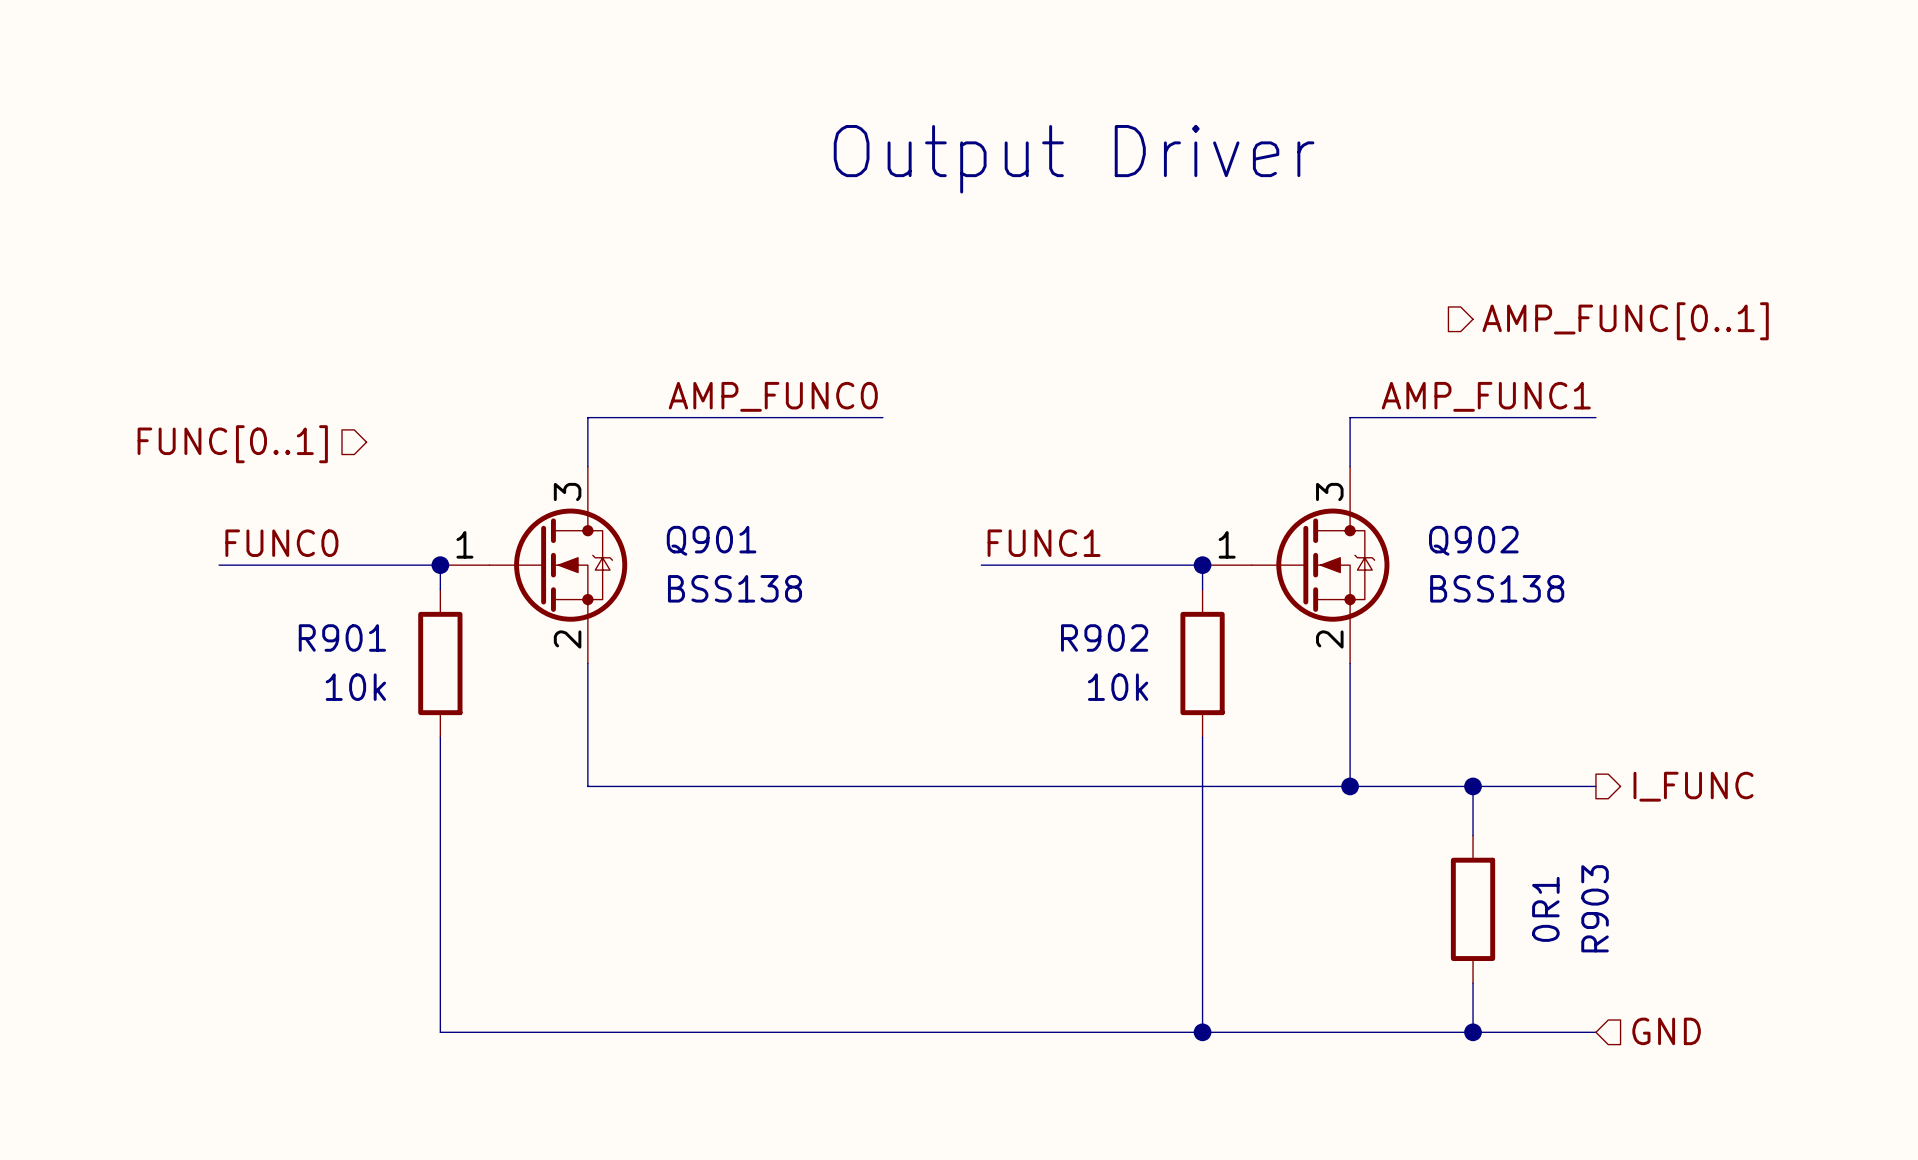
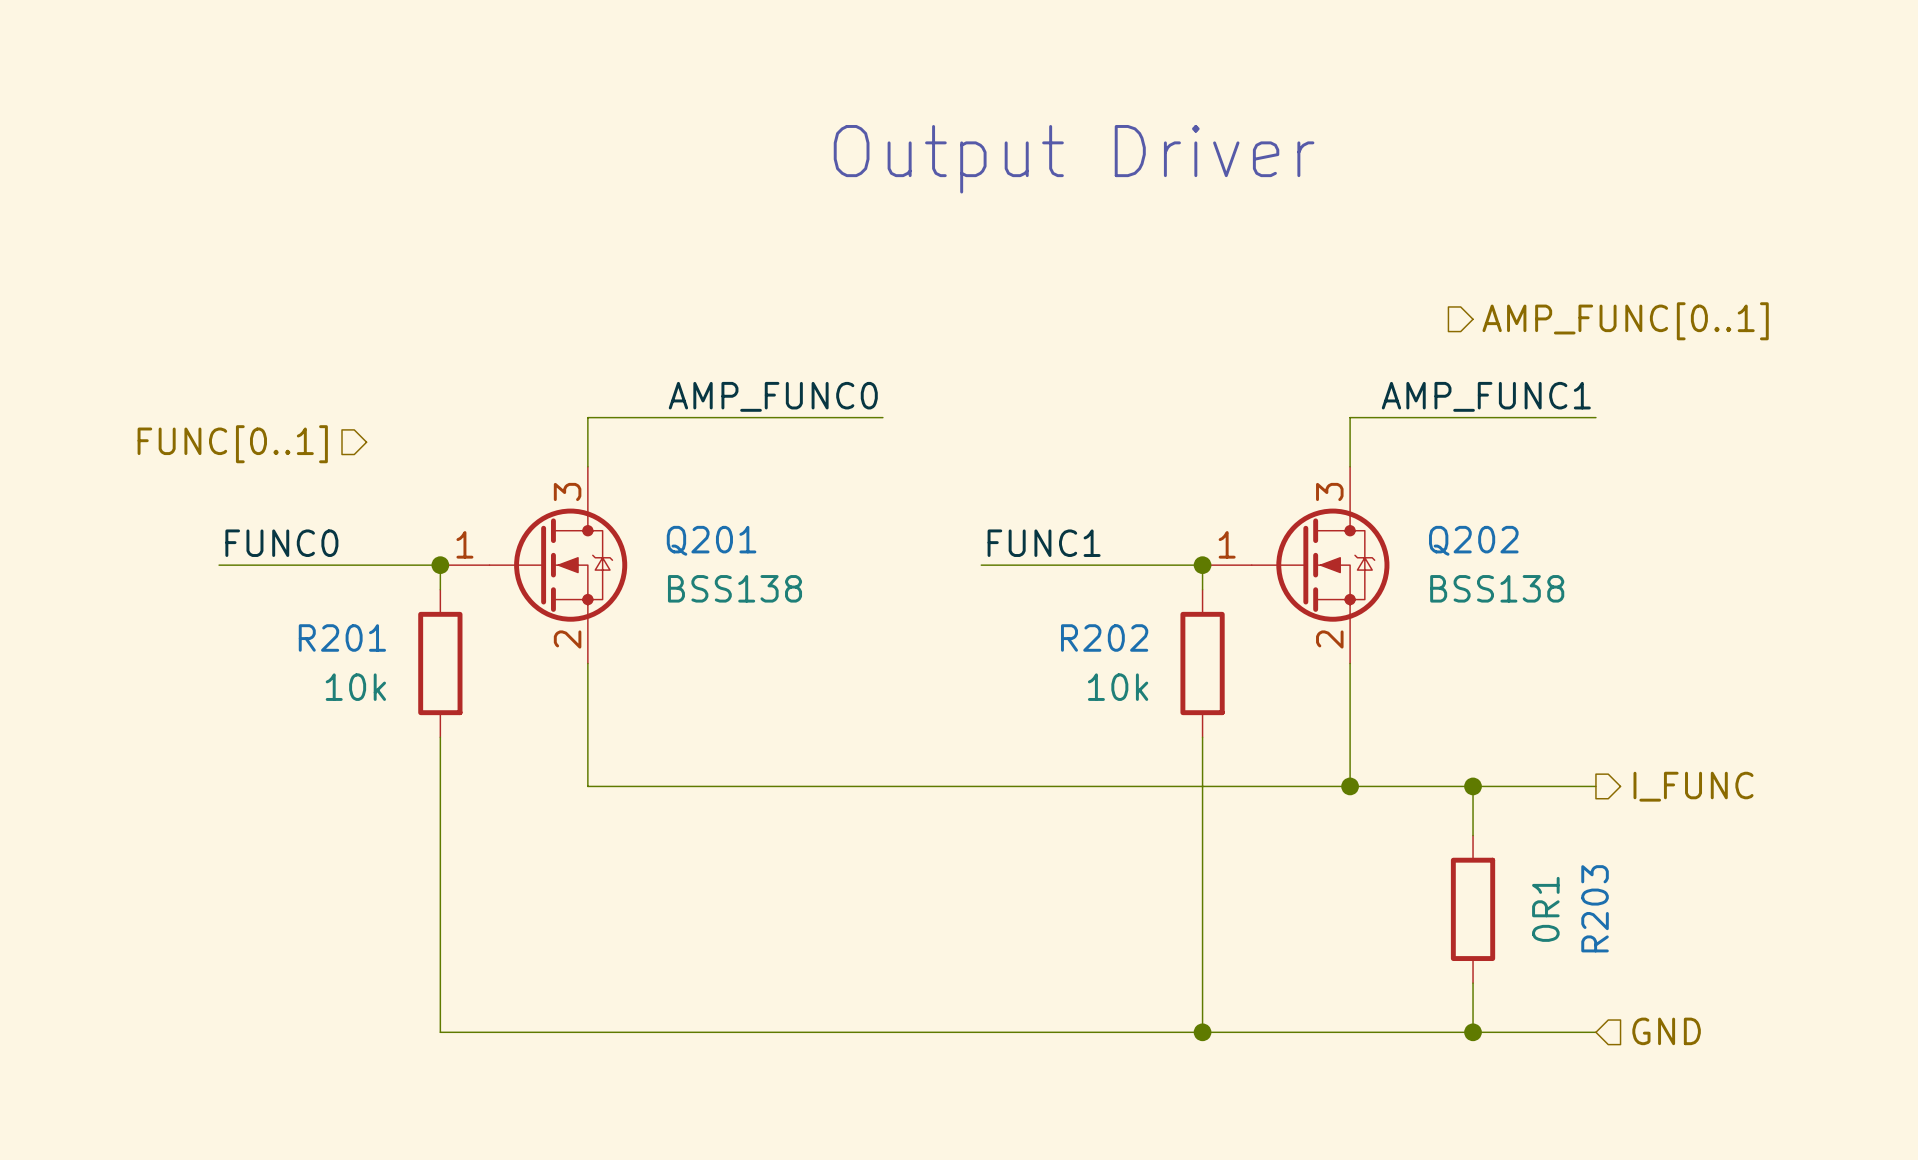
Q901 name: Q901 (711, 540) -> Q201 (711, 540)
Q902 name: Q902 (1473, 540) -> Q202 (1473, 540)
R901 name: R901 (342, 637) -> R201 (342, 637)
R902 name: R902 (1104, 637) -> R202 (1104, 637)
R903 name: R903 (1595, 908) -> R203 (1595, 908)

